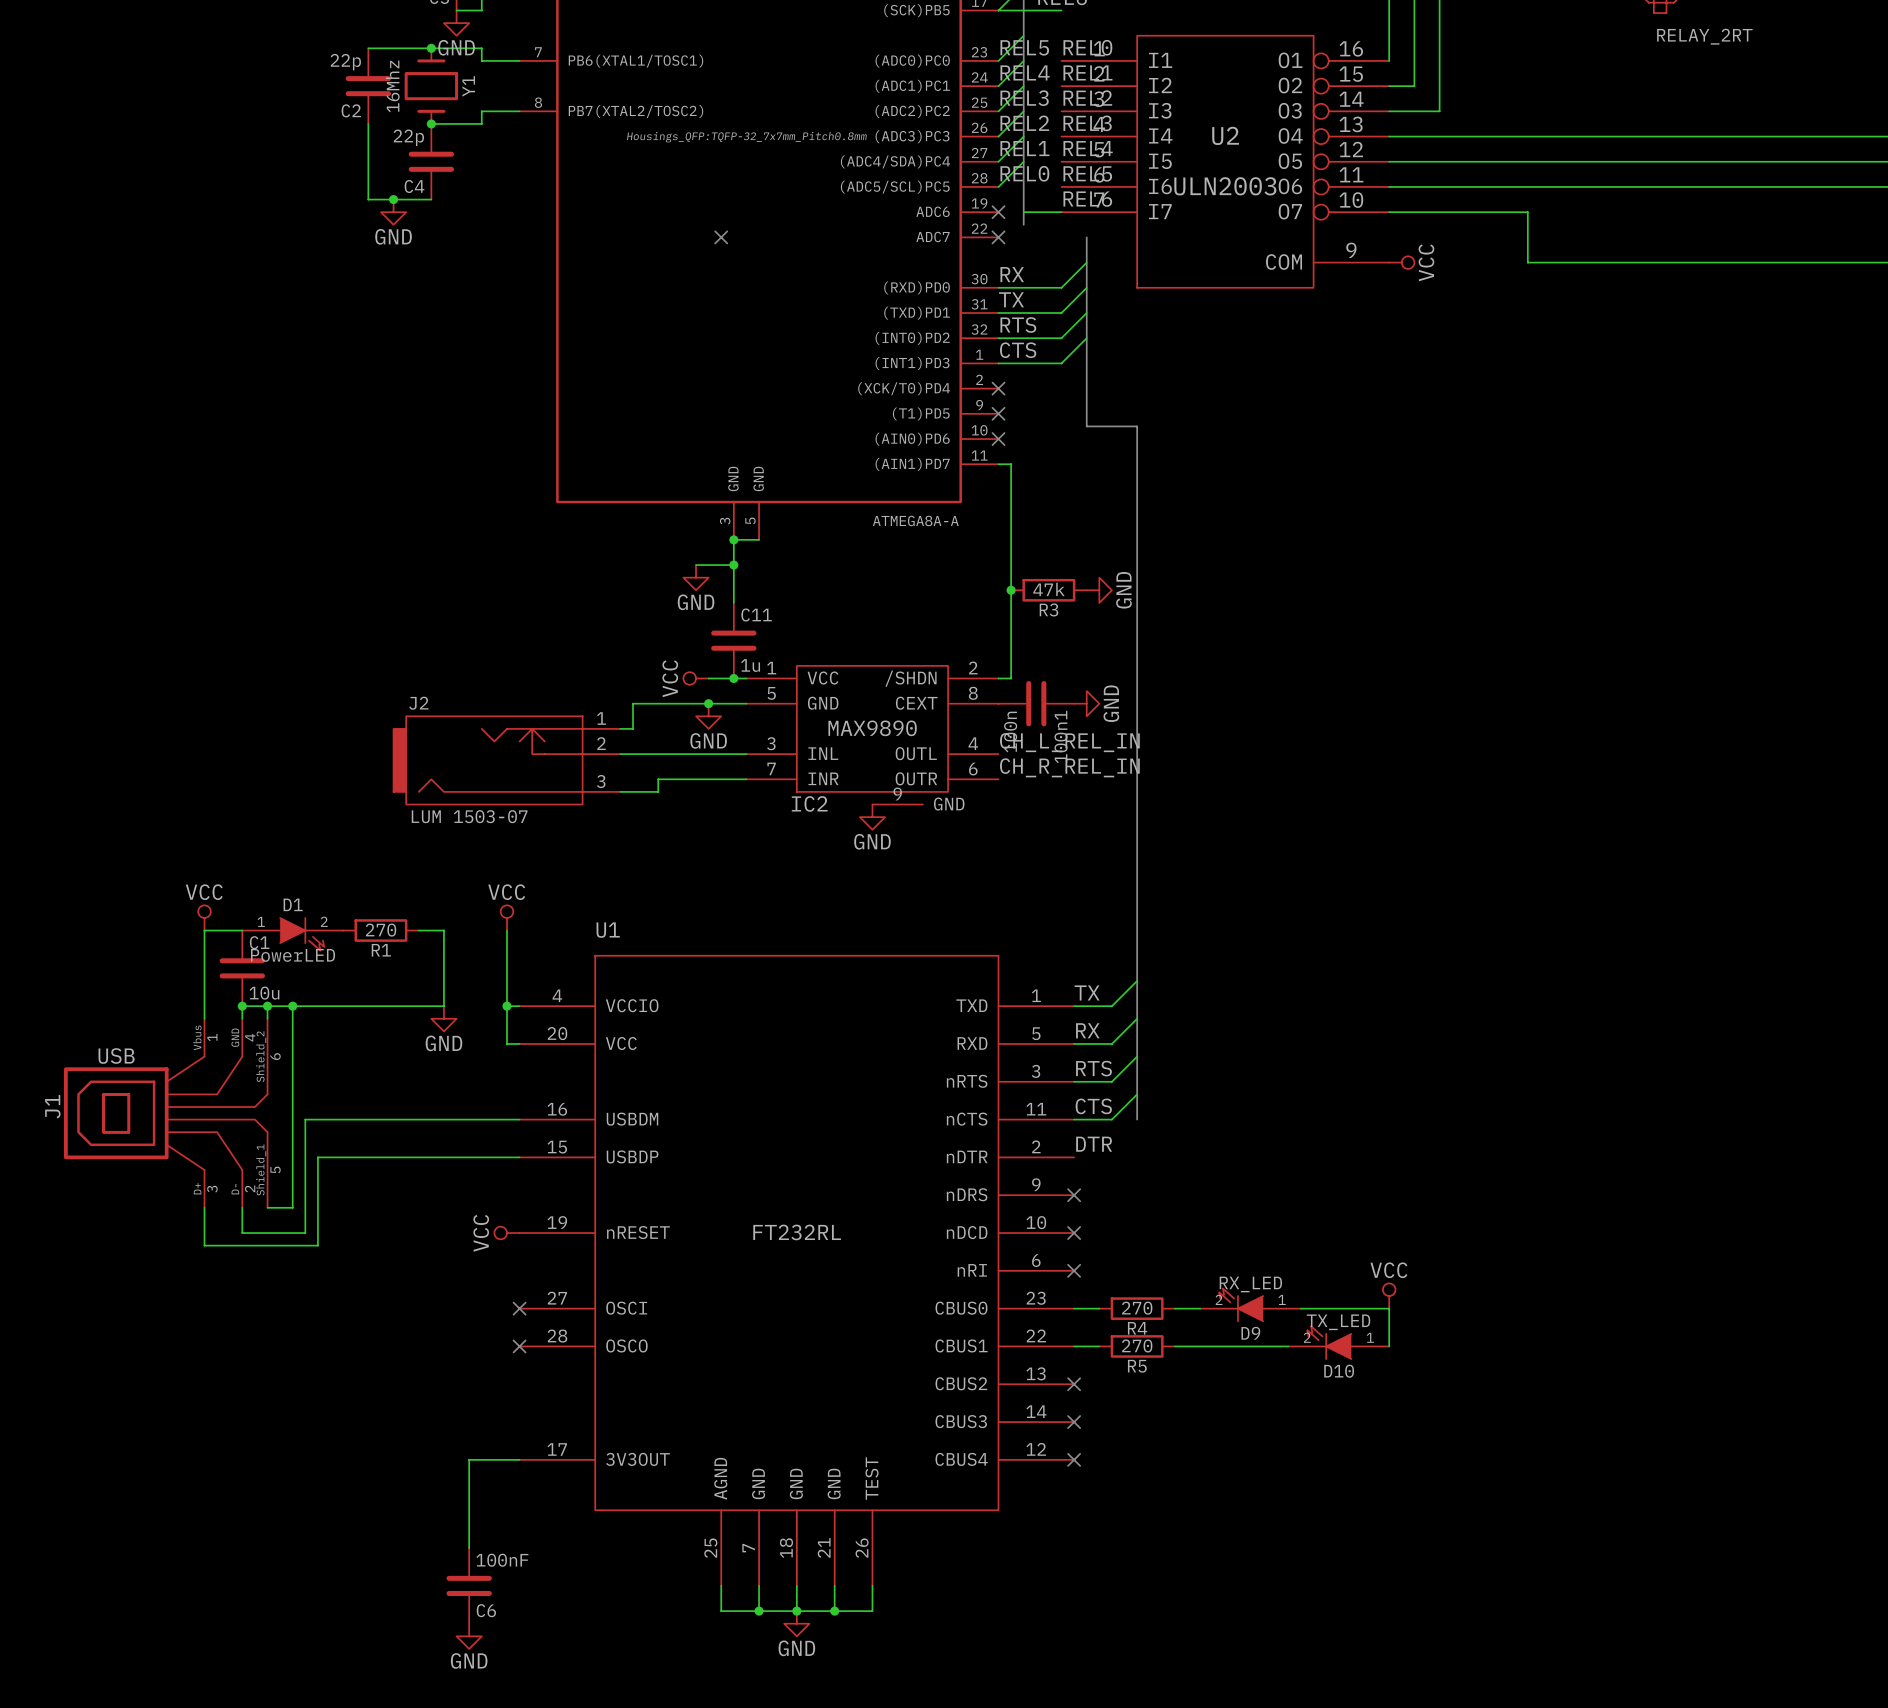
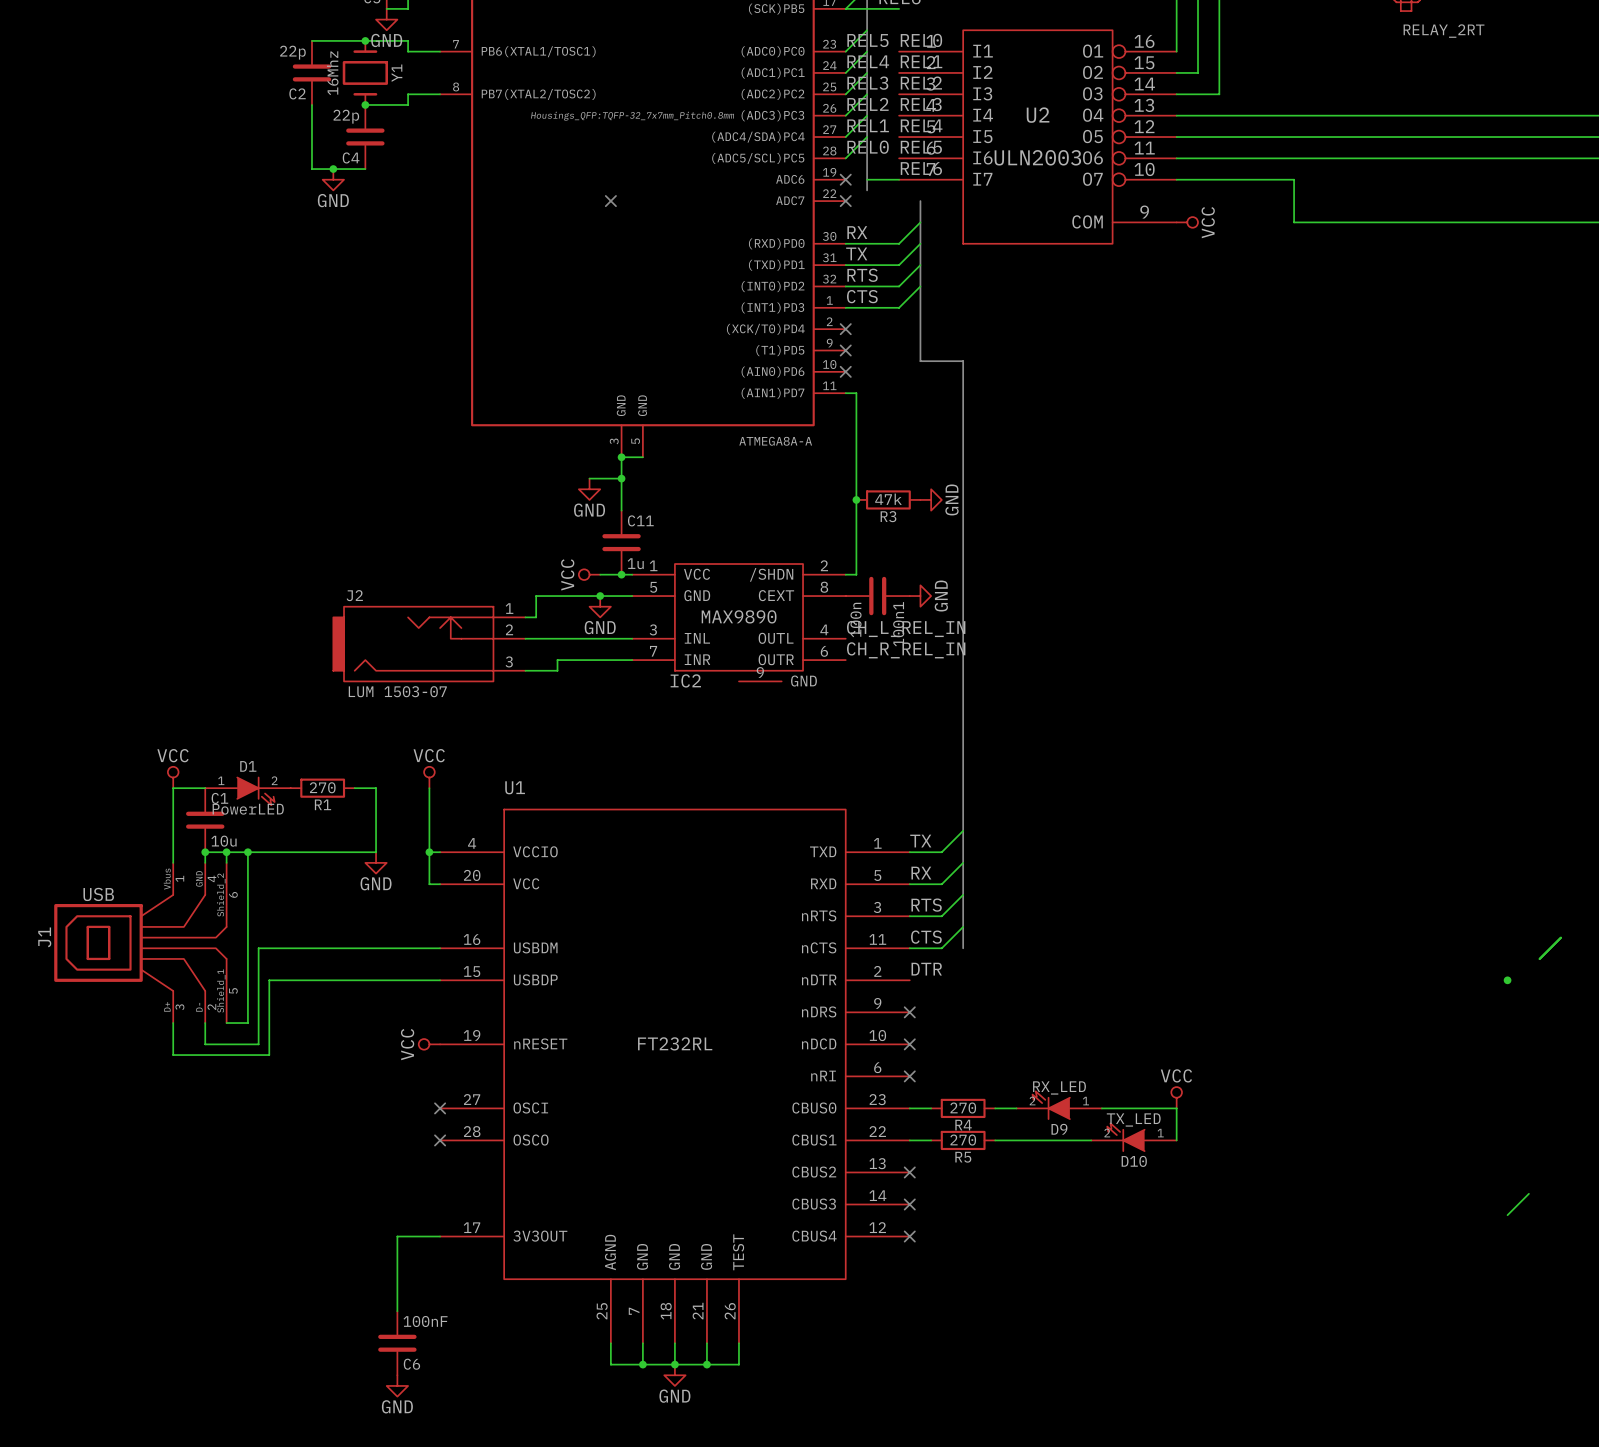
power symbol: GND (872, 817) -> none
wire: none -> (1560, 937) (1539, 958)
junction: none -> (1507, 980)
wire: none -> (1528, 1193) (1507, 1215)

